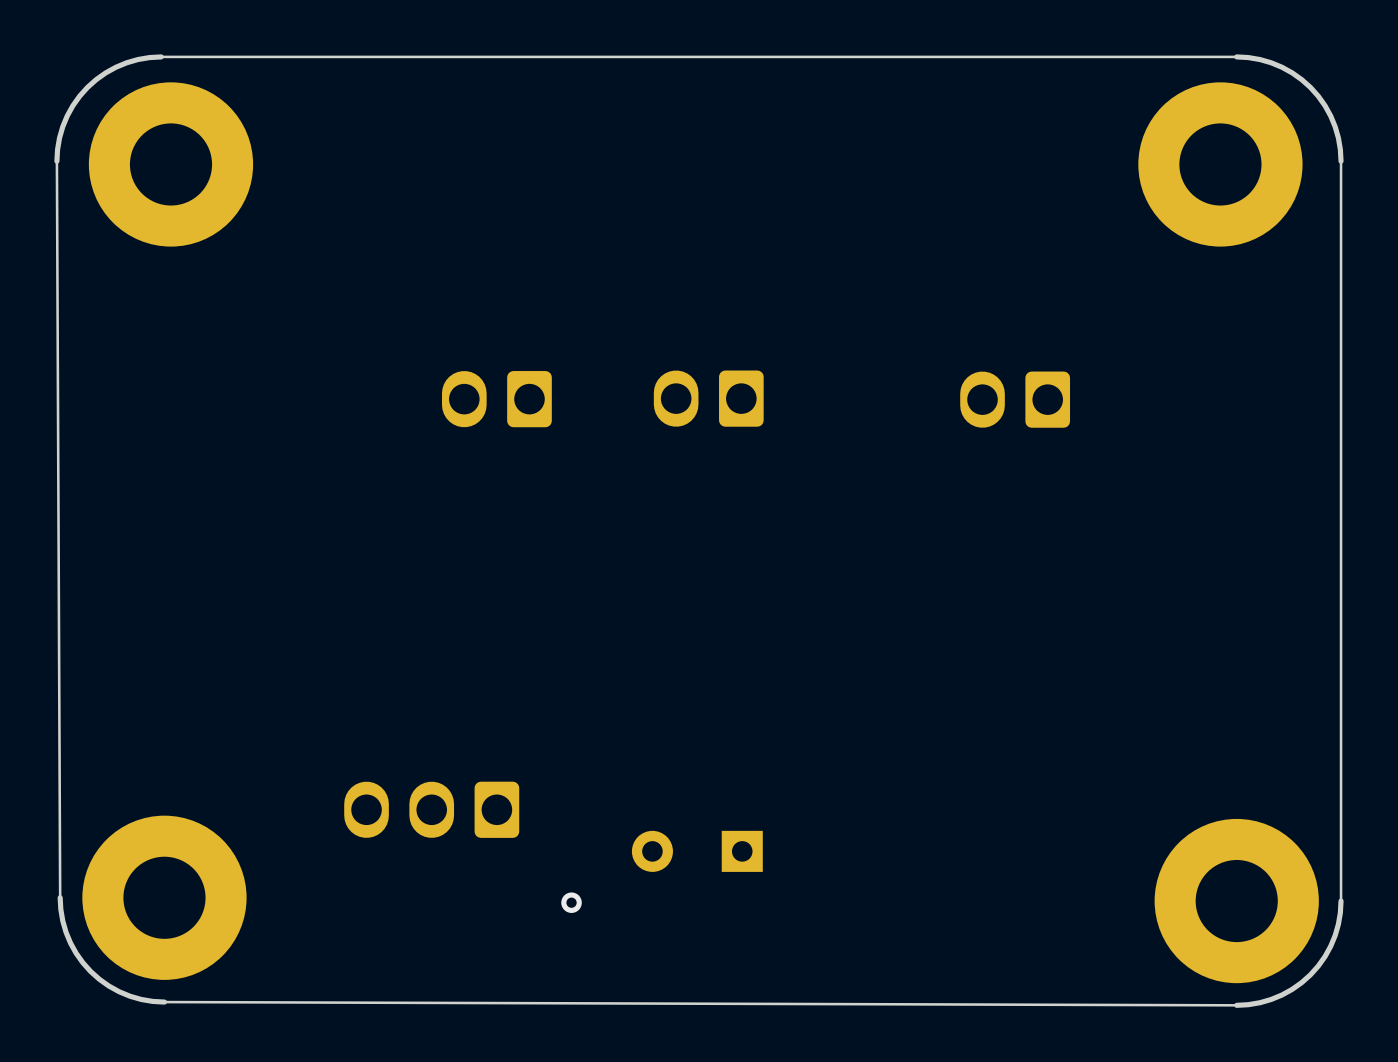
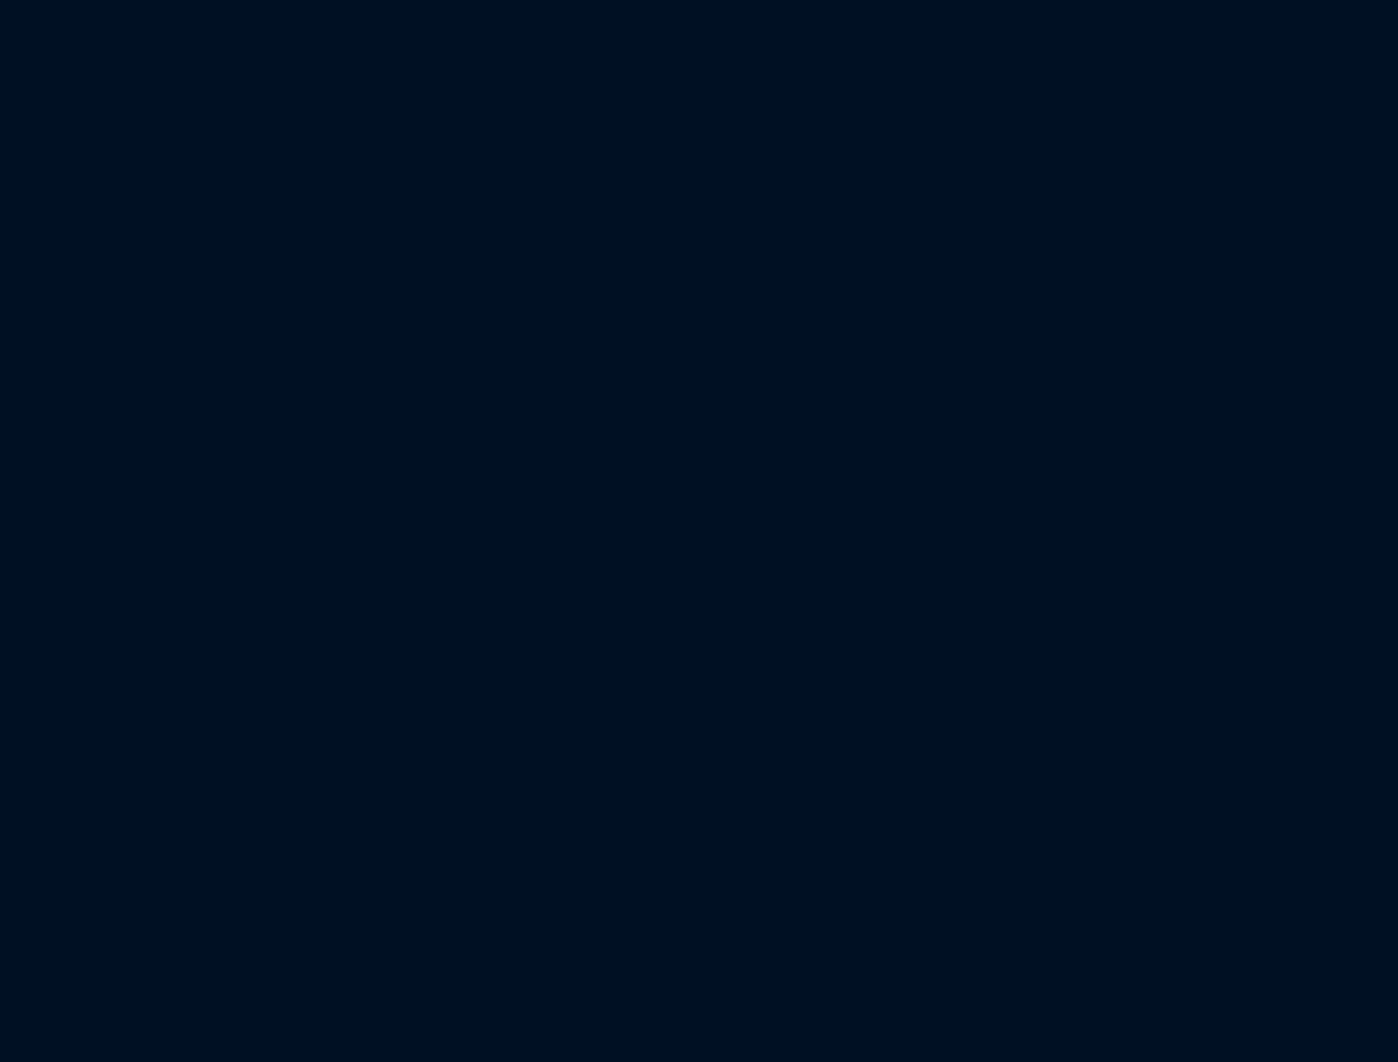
board edge: (1236, 56) (161, 56) (126, 62) (96, 79) (79, 96) (67, 115) (59, 138) (56, 161) (60, 897) (66, 932) (82, 962) (99, 979) (119, 991) (141, 999) (164, 1002) (1236, 1005) (1271, 999) (1301, 982) (1318, 966) (1330, 946) (1338, 924) (1341, 901) (1340, 149) (1335, 126) (1325, 105) (1301, 79) (1271, 62) (1236, 56) -> none
part: (170, 164) -> none
part: (1220, 164) -> none
part: (708, 398) -> none
part: (496, 399) -> none
part: (1015, 399) -> none
part: (431, 809) -> none
part: (697, 851) -> none
part: (164, 897) -> none
part: (1236, 901) -> none
via: (571, 902) -> none

